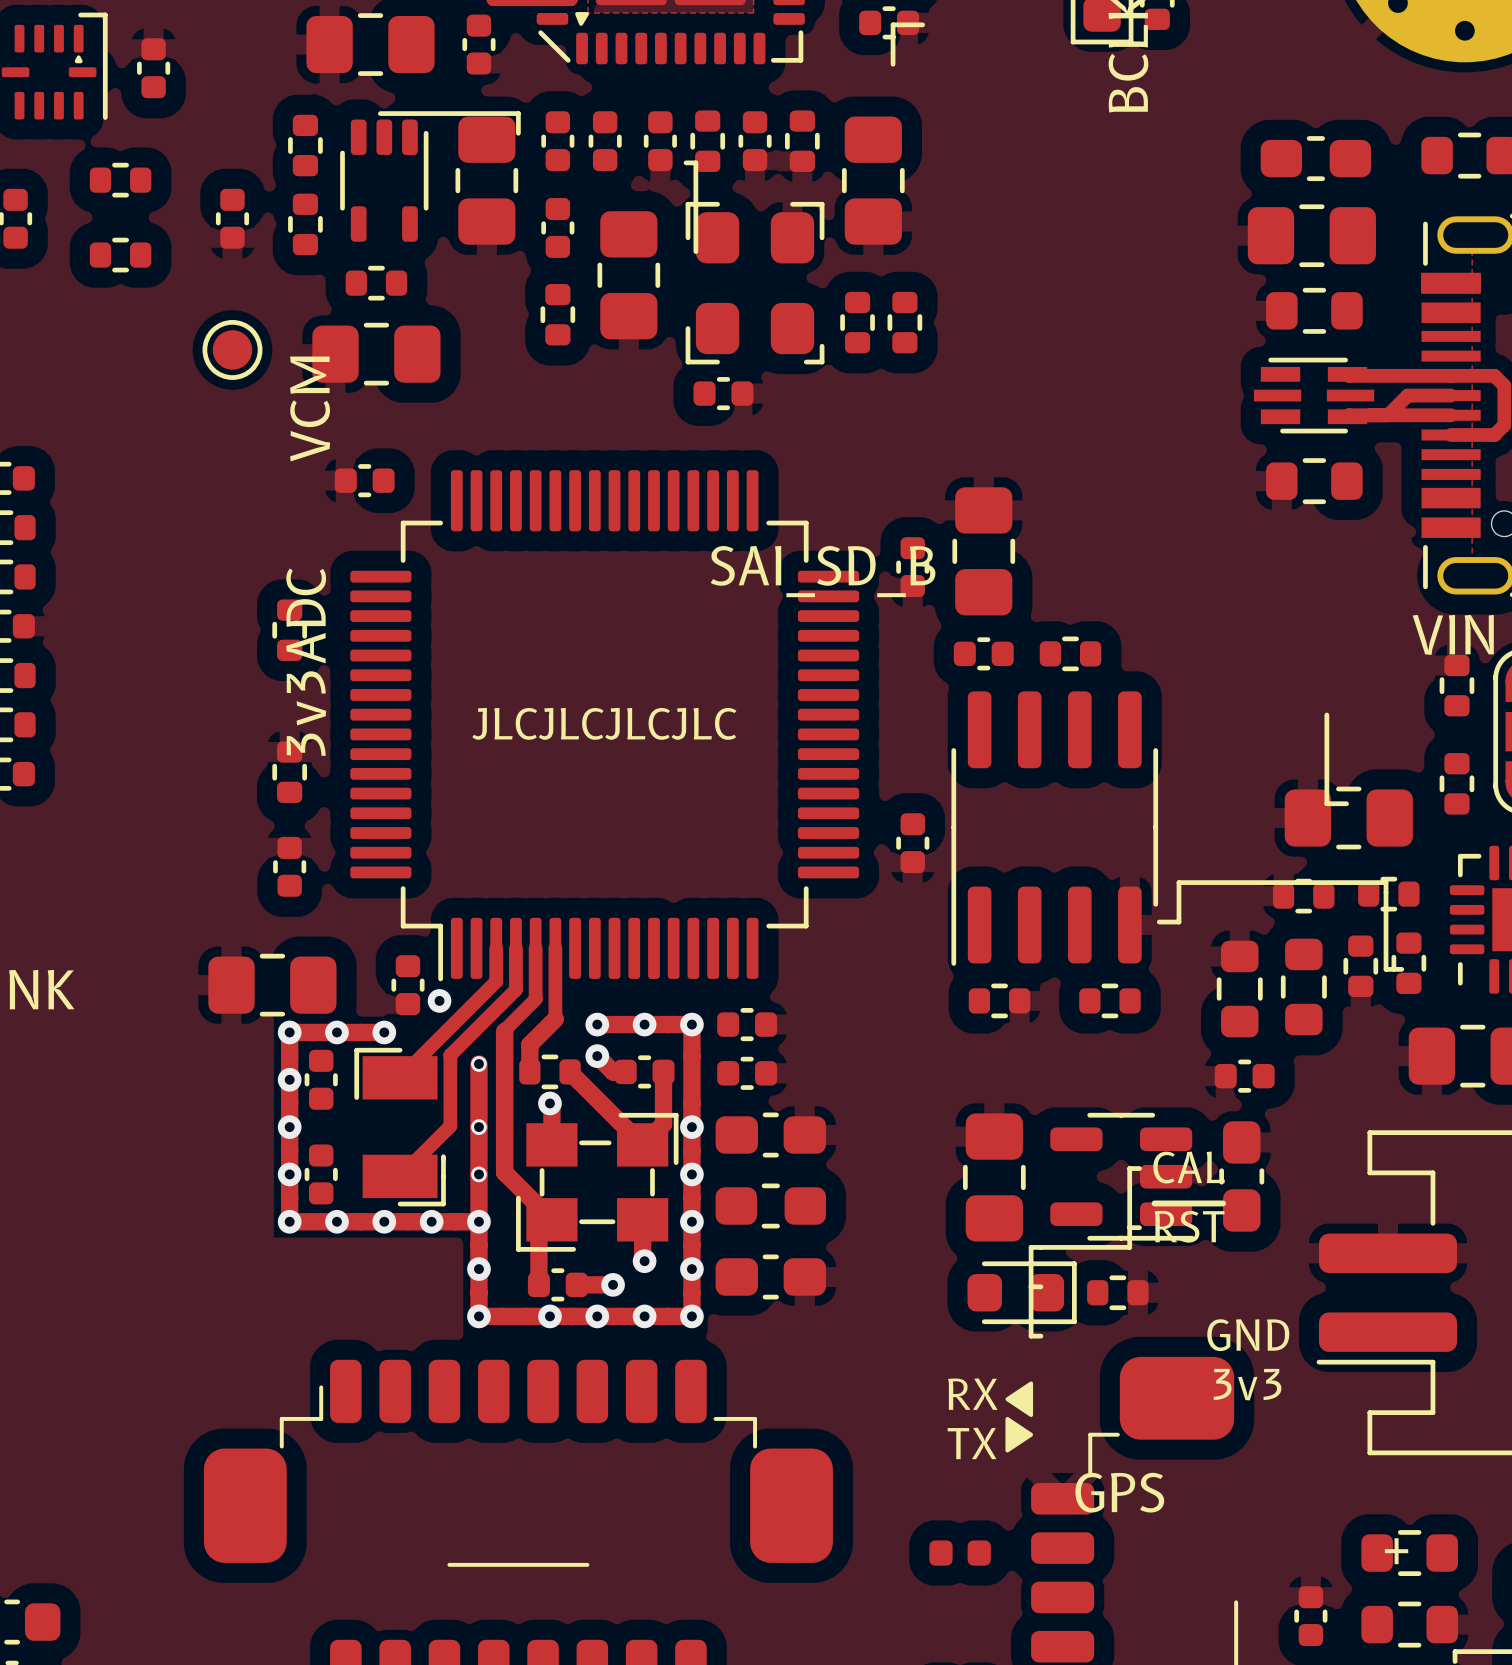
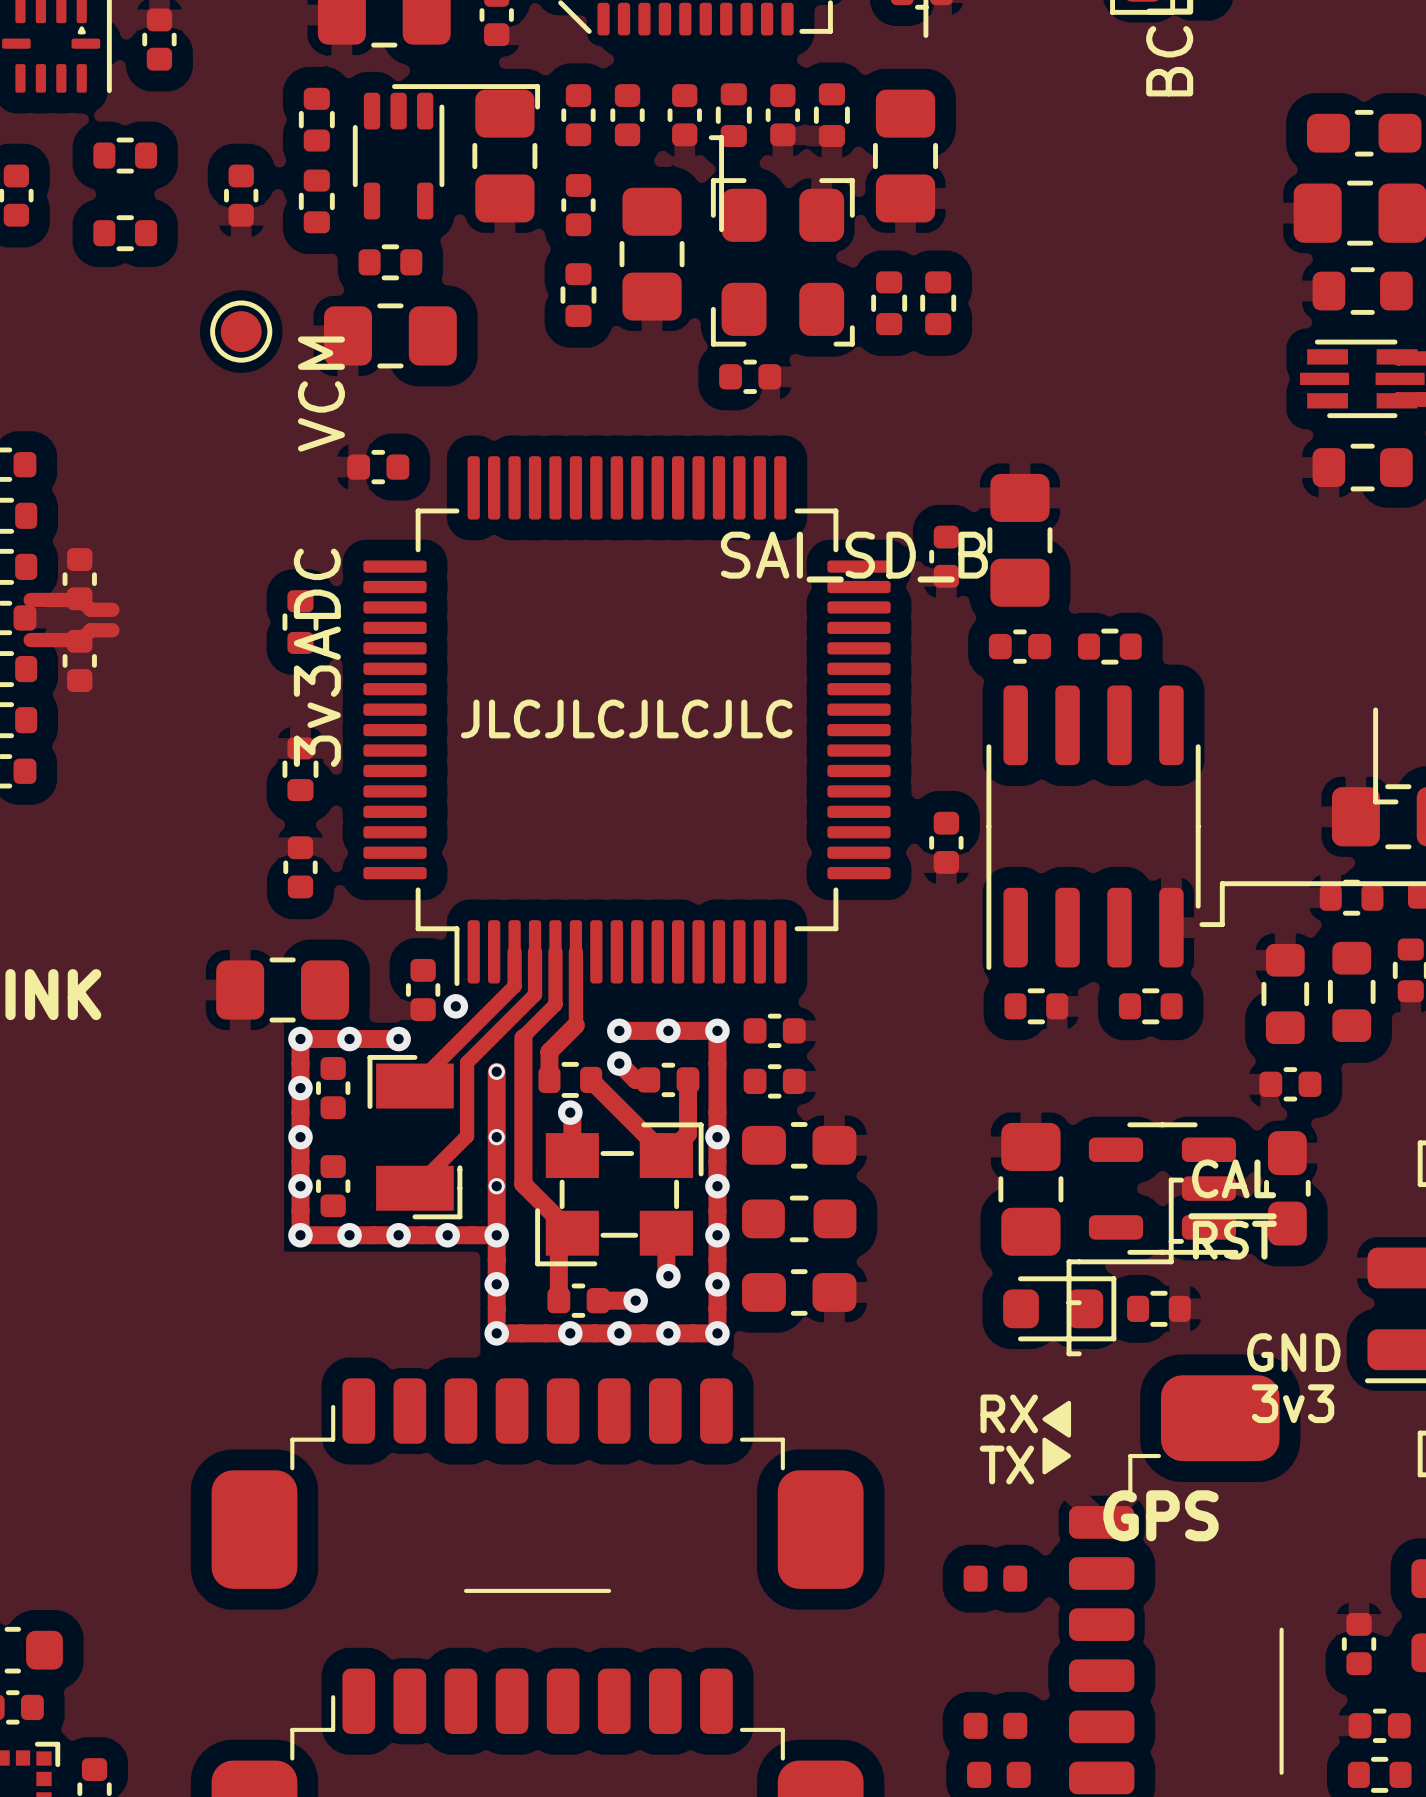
part: none -> (79, 579)
track: none -> (30, 600) (79, 598) (90, 609) (112, 609)
track: none -> (112, 630) (90, 630) (79, 641) (30, 640)
part: none -> (79, 660)

